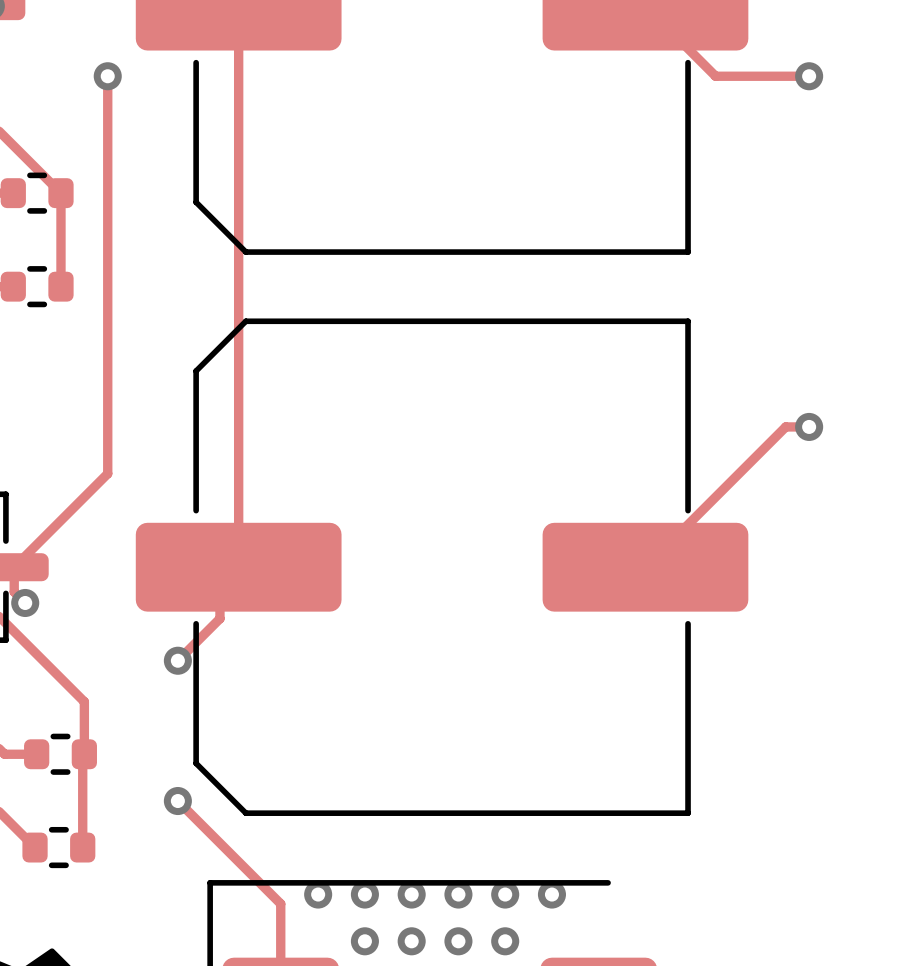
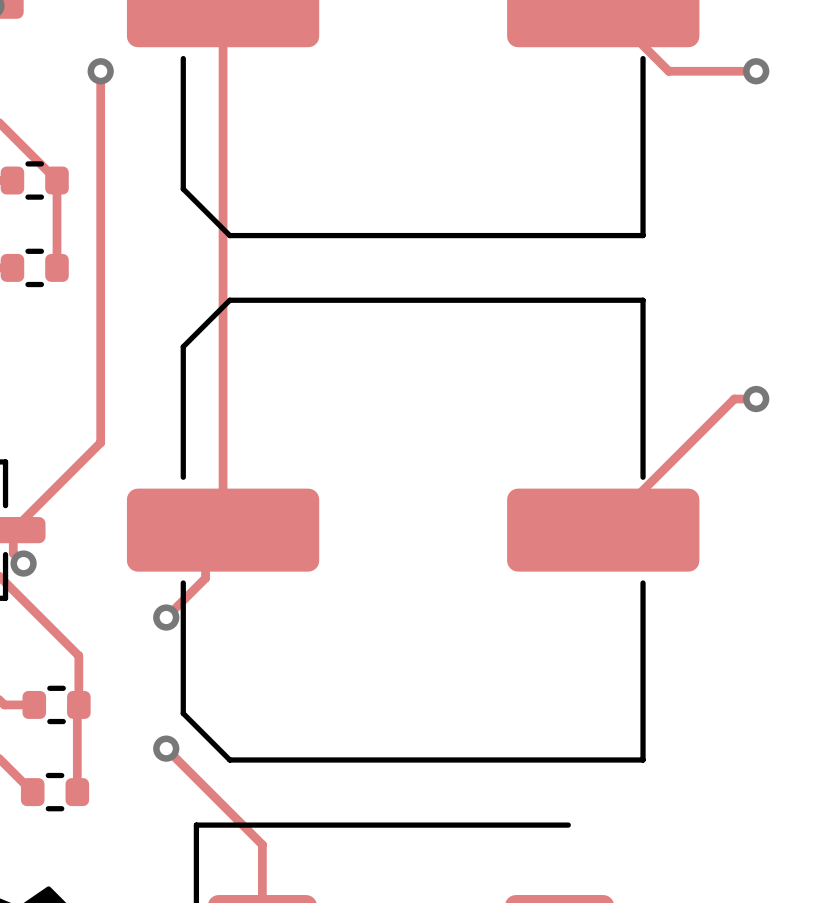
via: (318, 894) -> none
via: (364, 894) -> none
via: (411, 894) -> none
via: (458, 894) -> none
via: (505, 894) -> none
via: (551, 894) -> none
via: (364, 941) -> none
via: (411, 941) -> none
via: (458, 941) -> none
via: (505, 941) -> none

